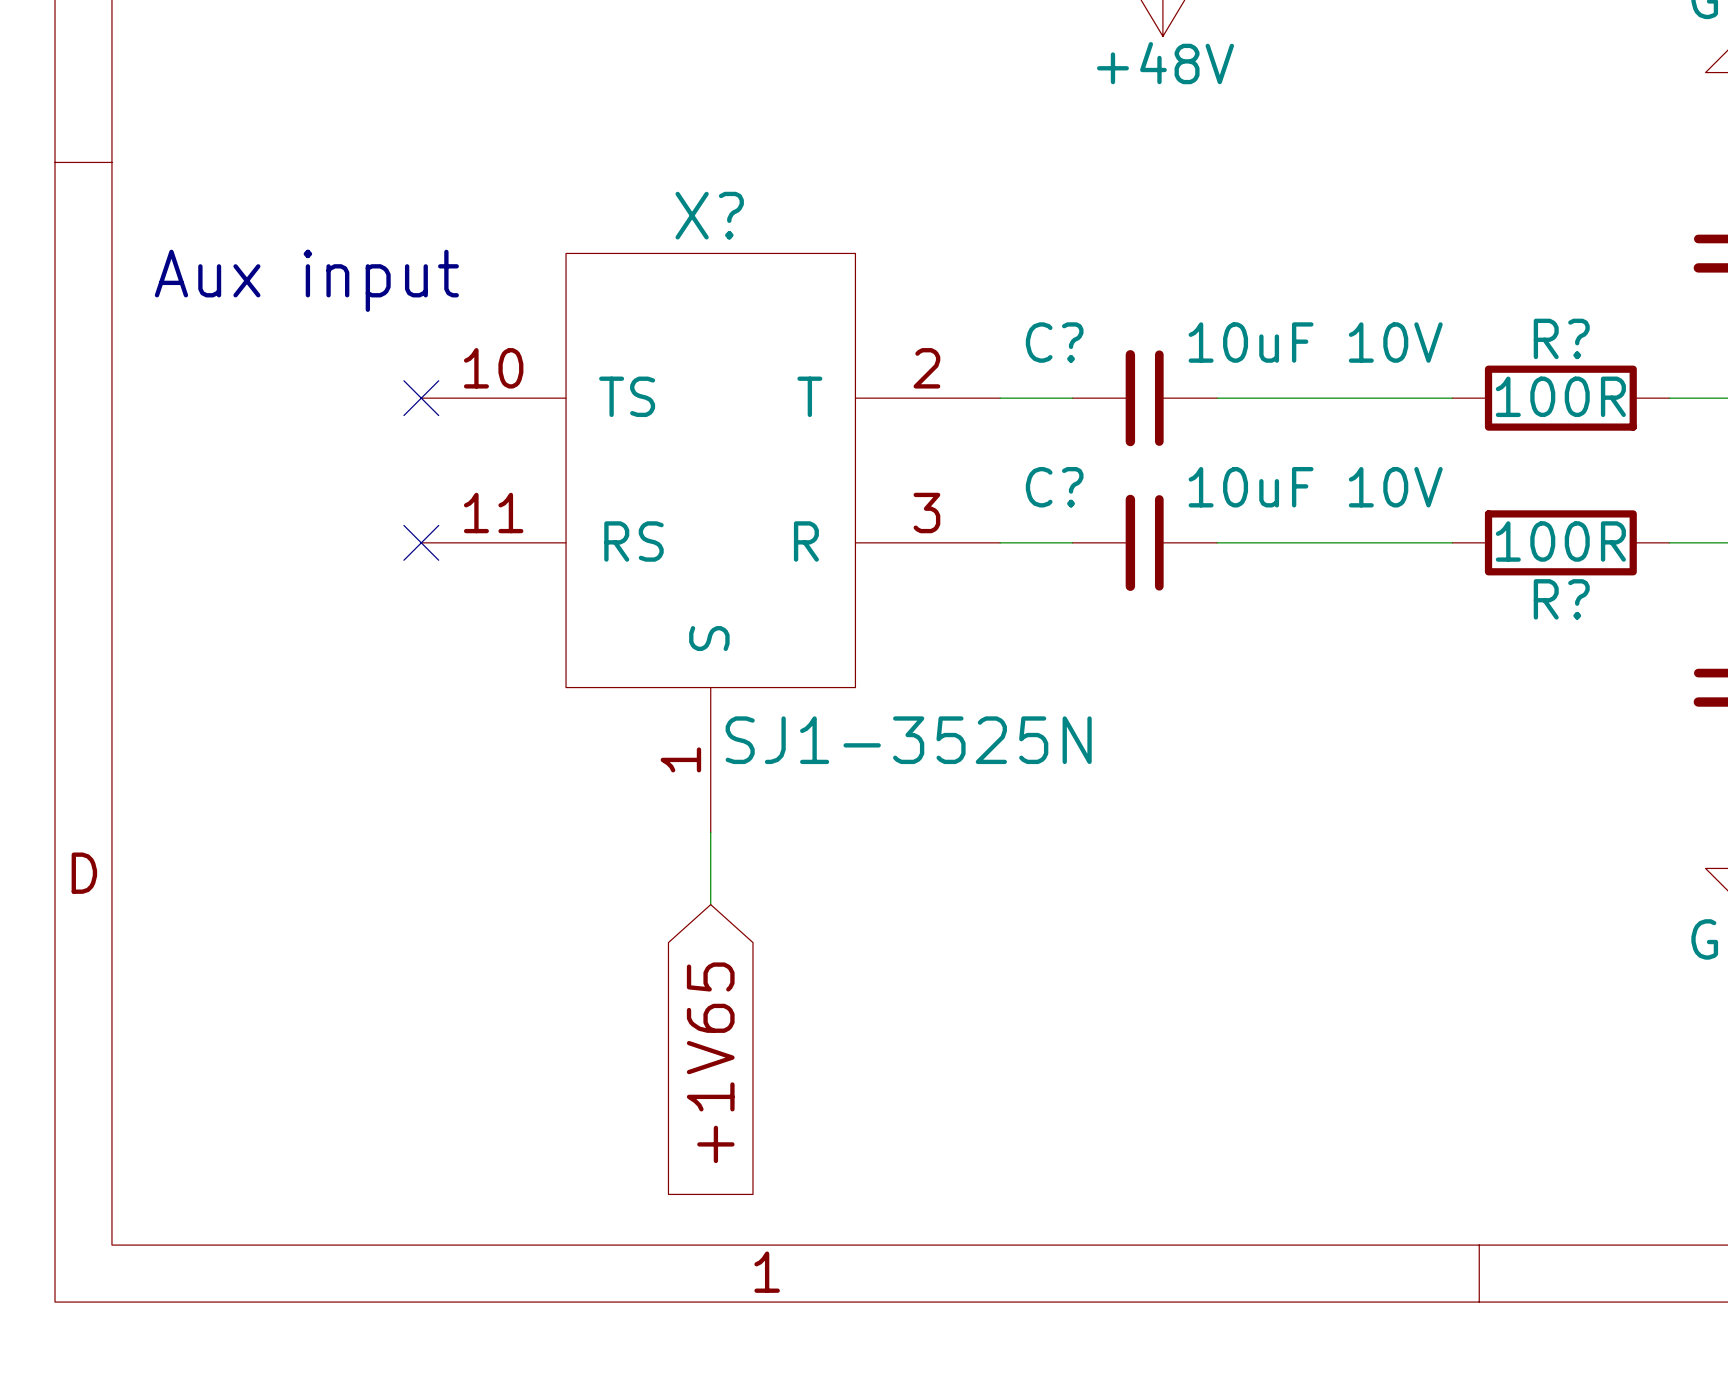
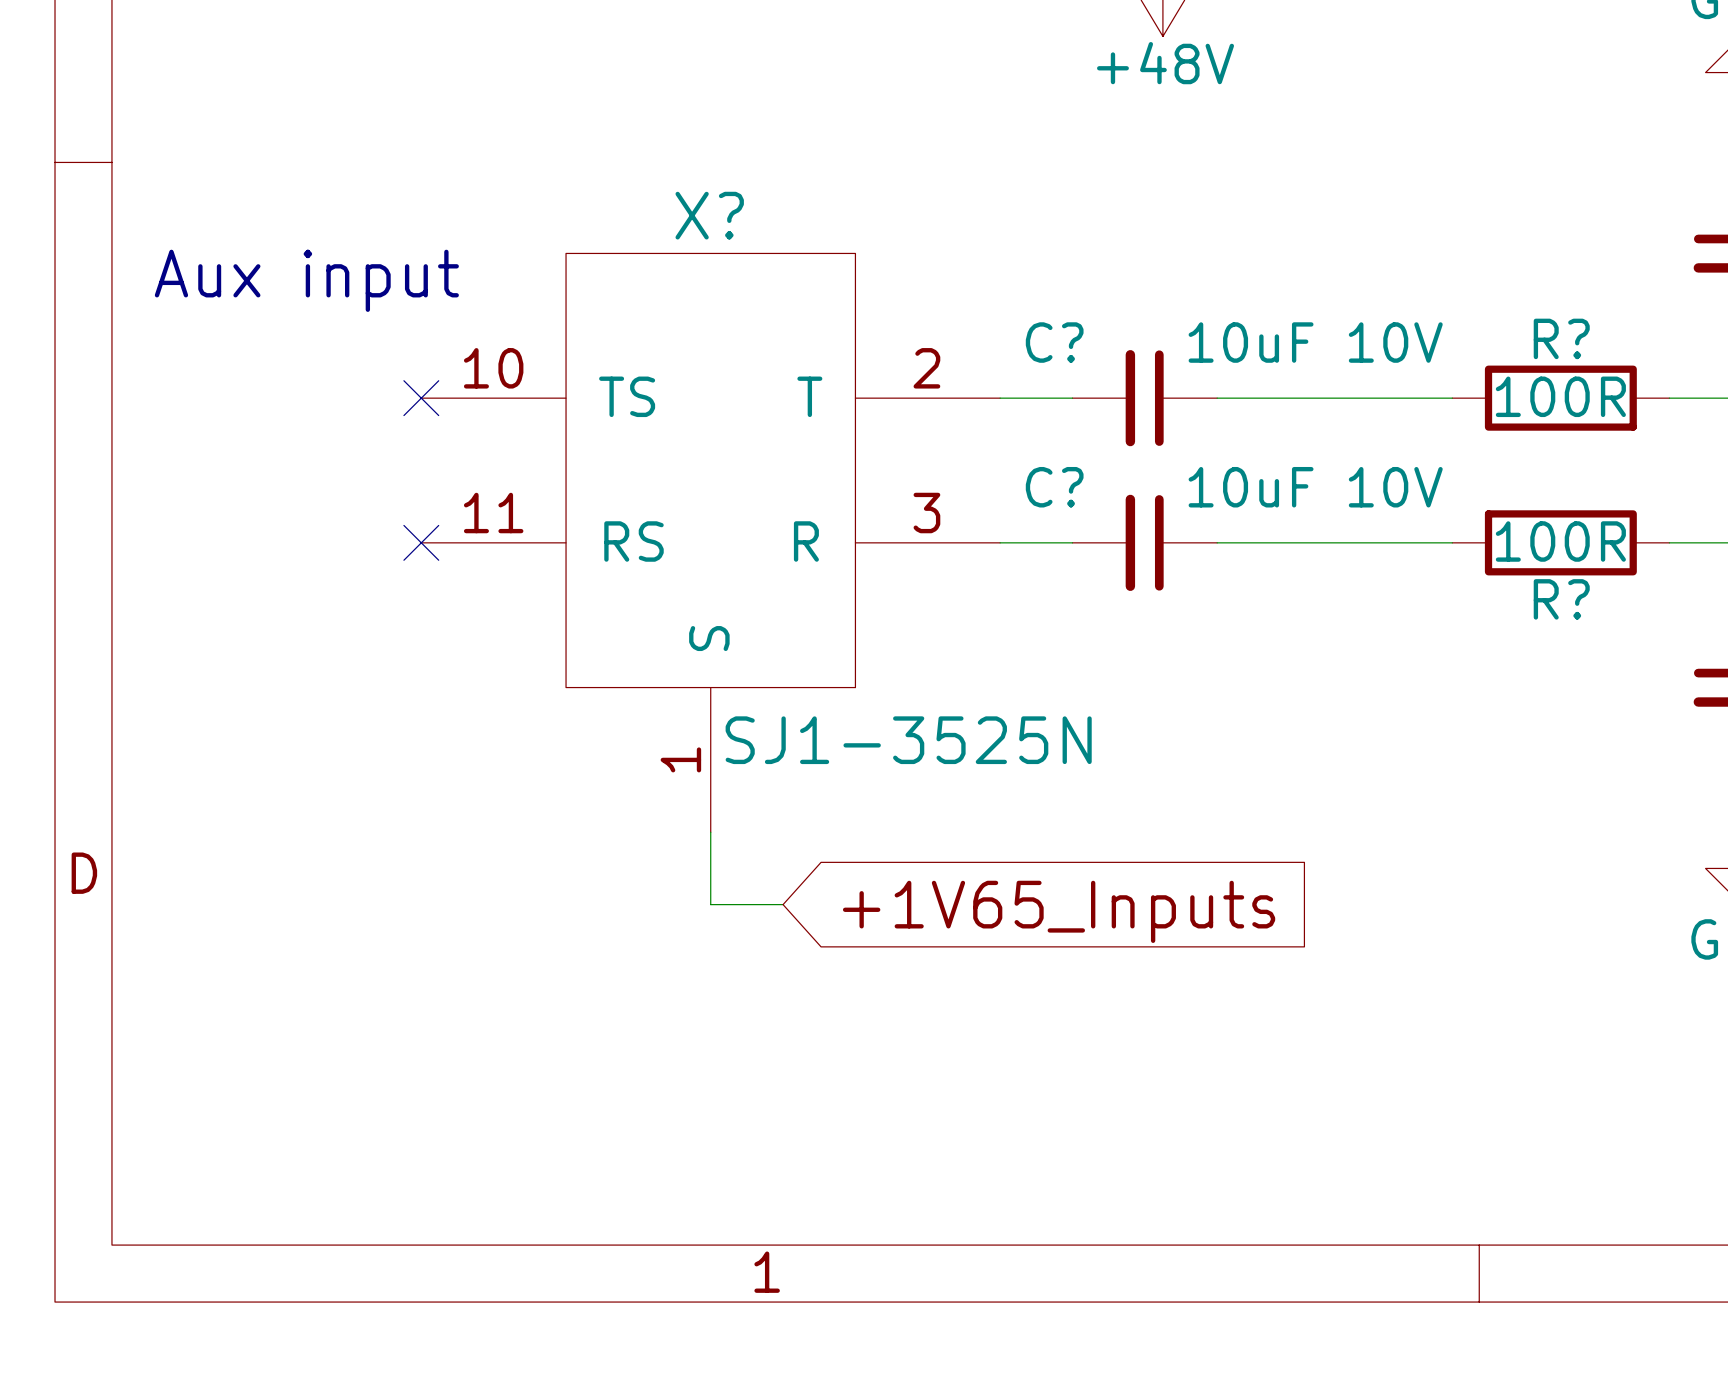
wire: none -> (710, 904) (783, 904)
global label: none -> +1V65_Inputs (1059, 911)
global label: +1V65 (710, 1062) -> none

